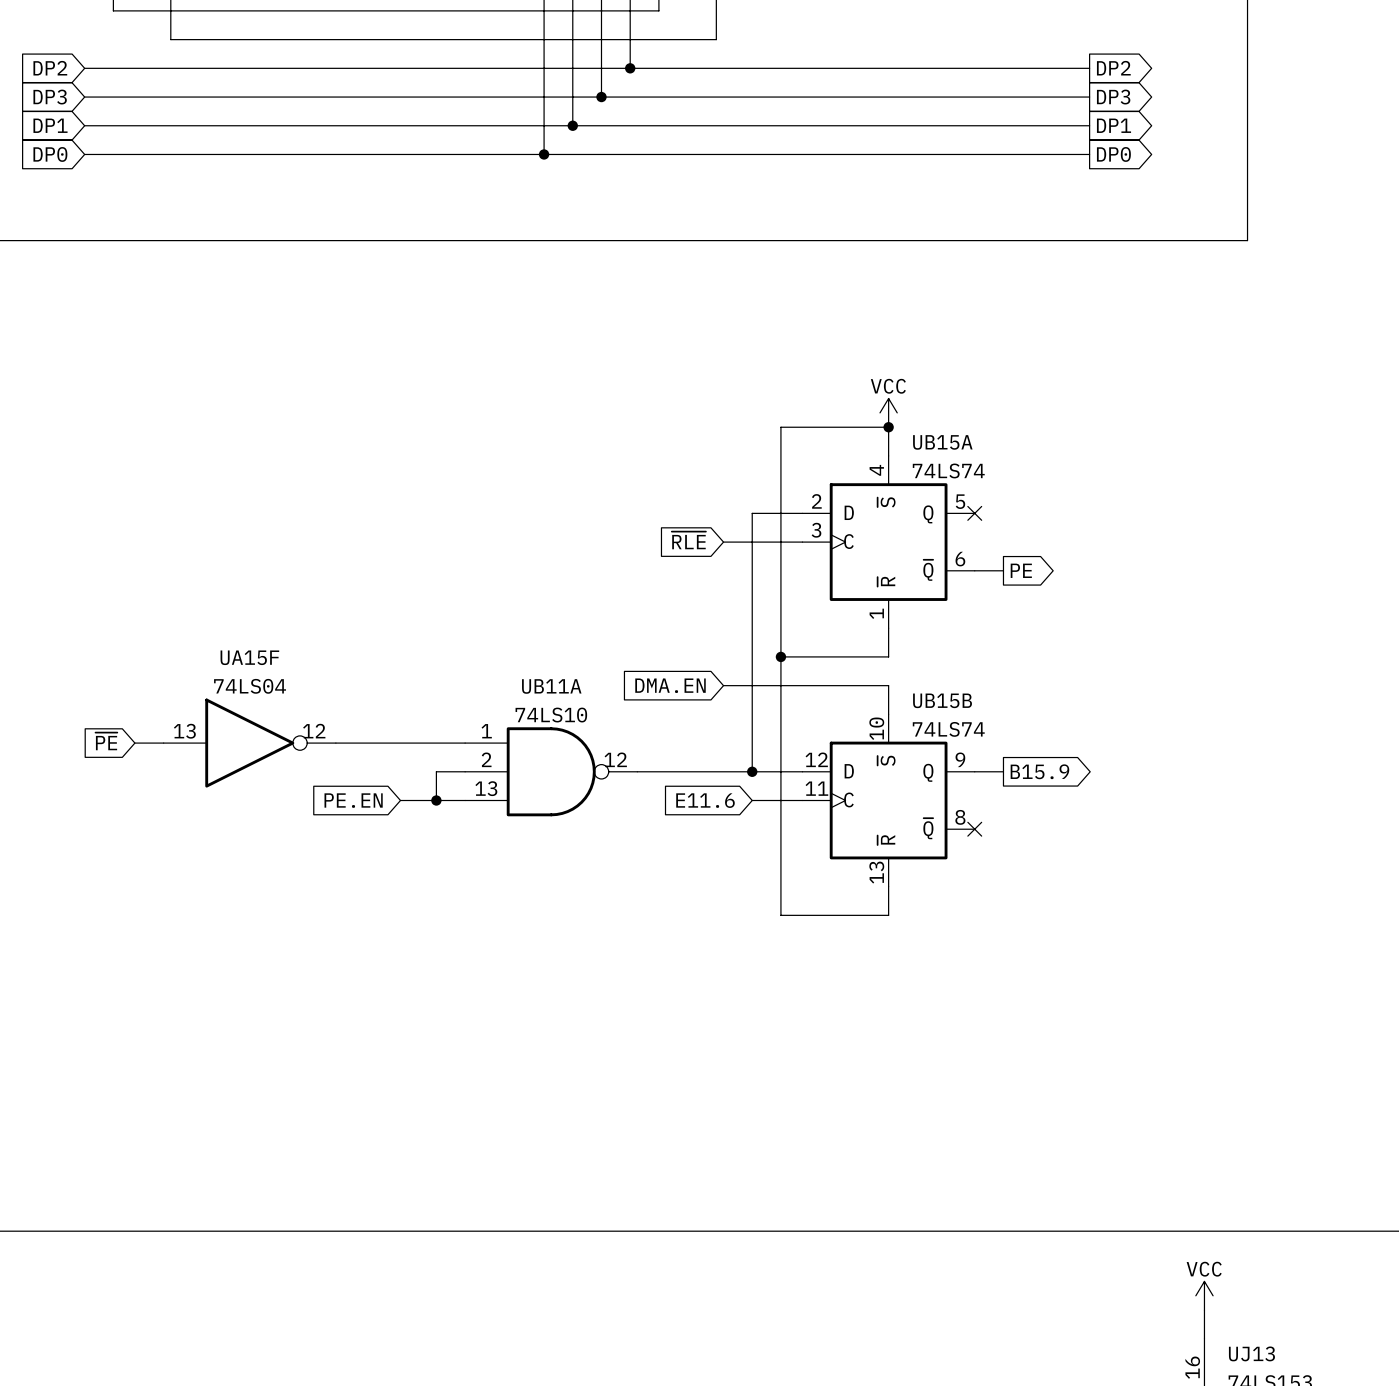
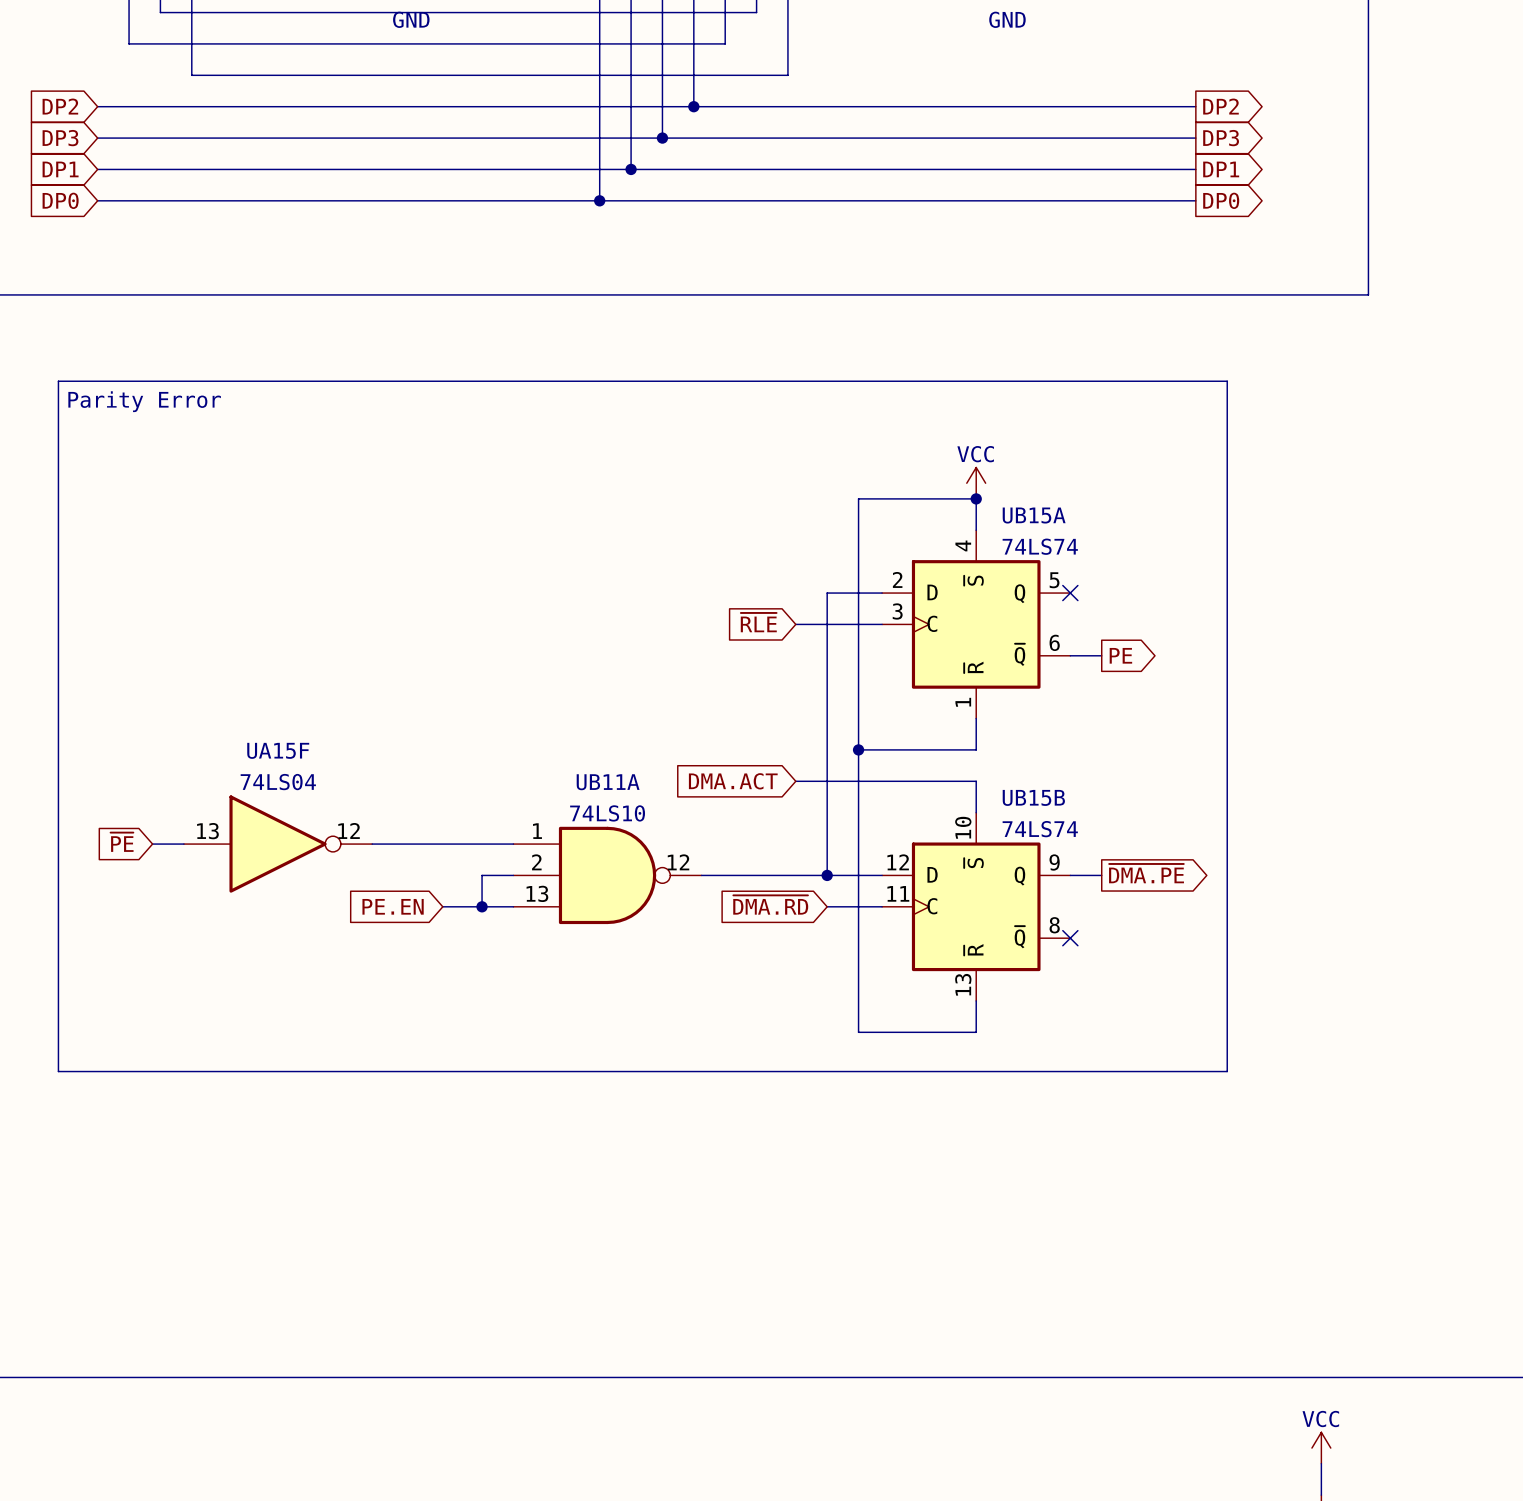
line: none -> (58, 381) (58, 1071) (1227, 1071) (1227, 381) (58, 381)
text: none -> Parity Error (144, 401)
global label: DMA.EN (670, 685) -> DMA.ACT (733, 781)
global label: B15.9 (1039, 771) -> ~{DMA.PE} (1146, 873)
global label: E11.6 (705, 800) -> ~{DMA.RD} (770, 905)

